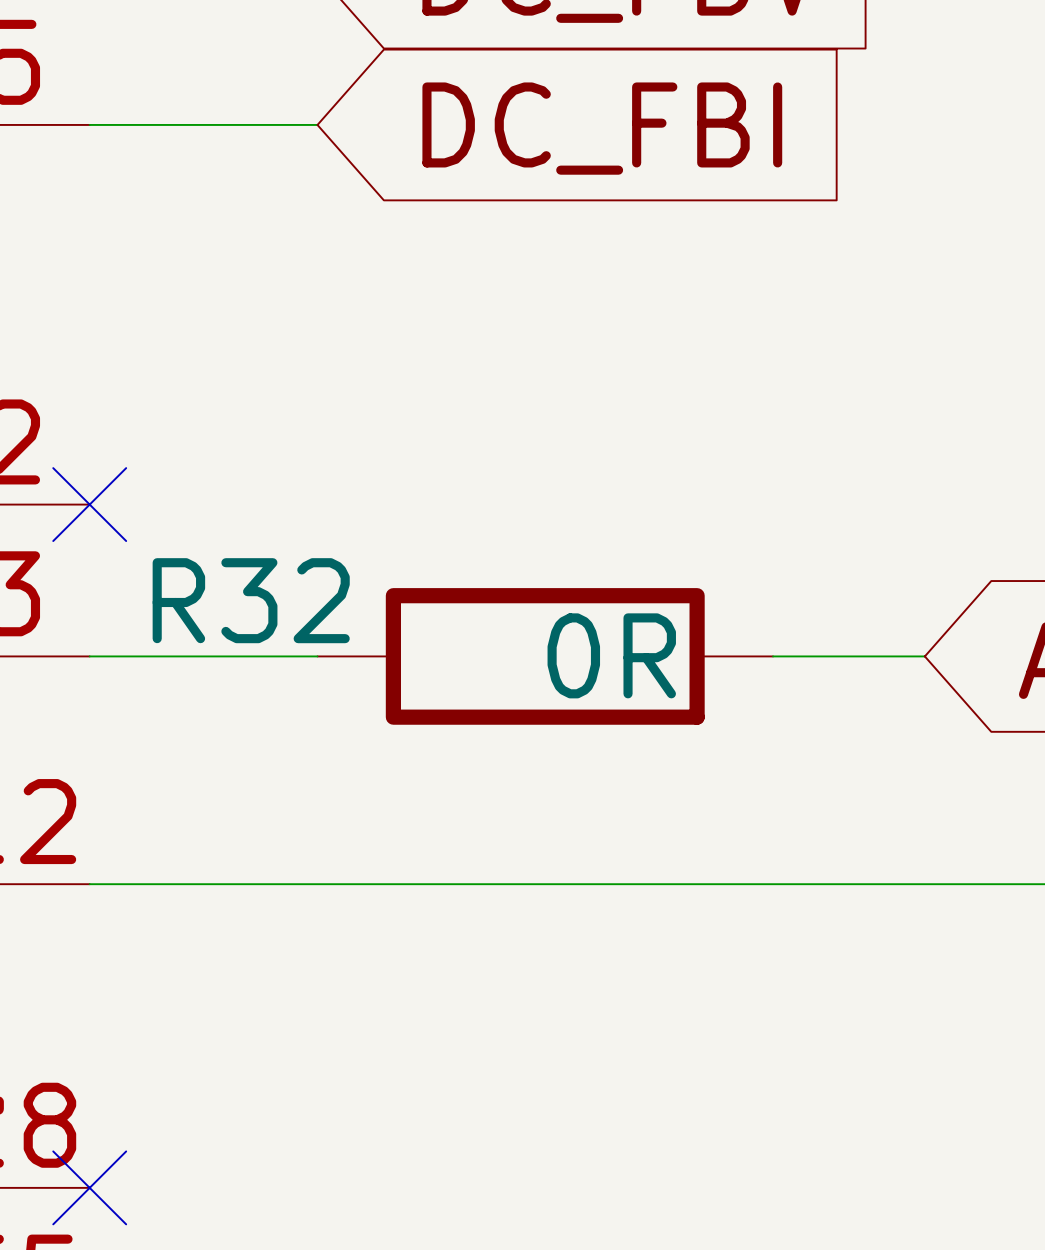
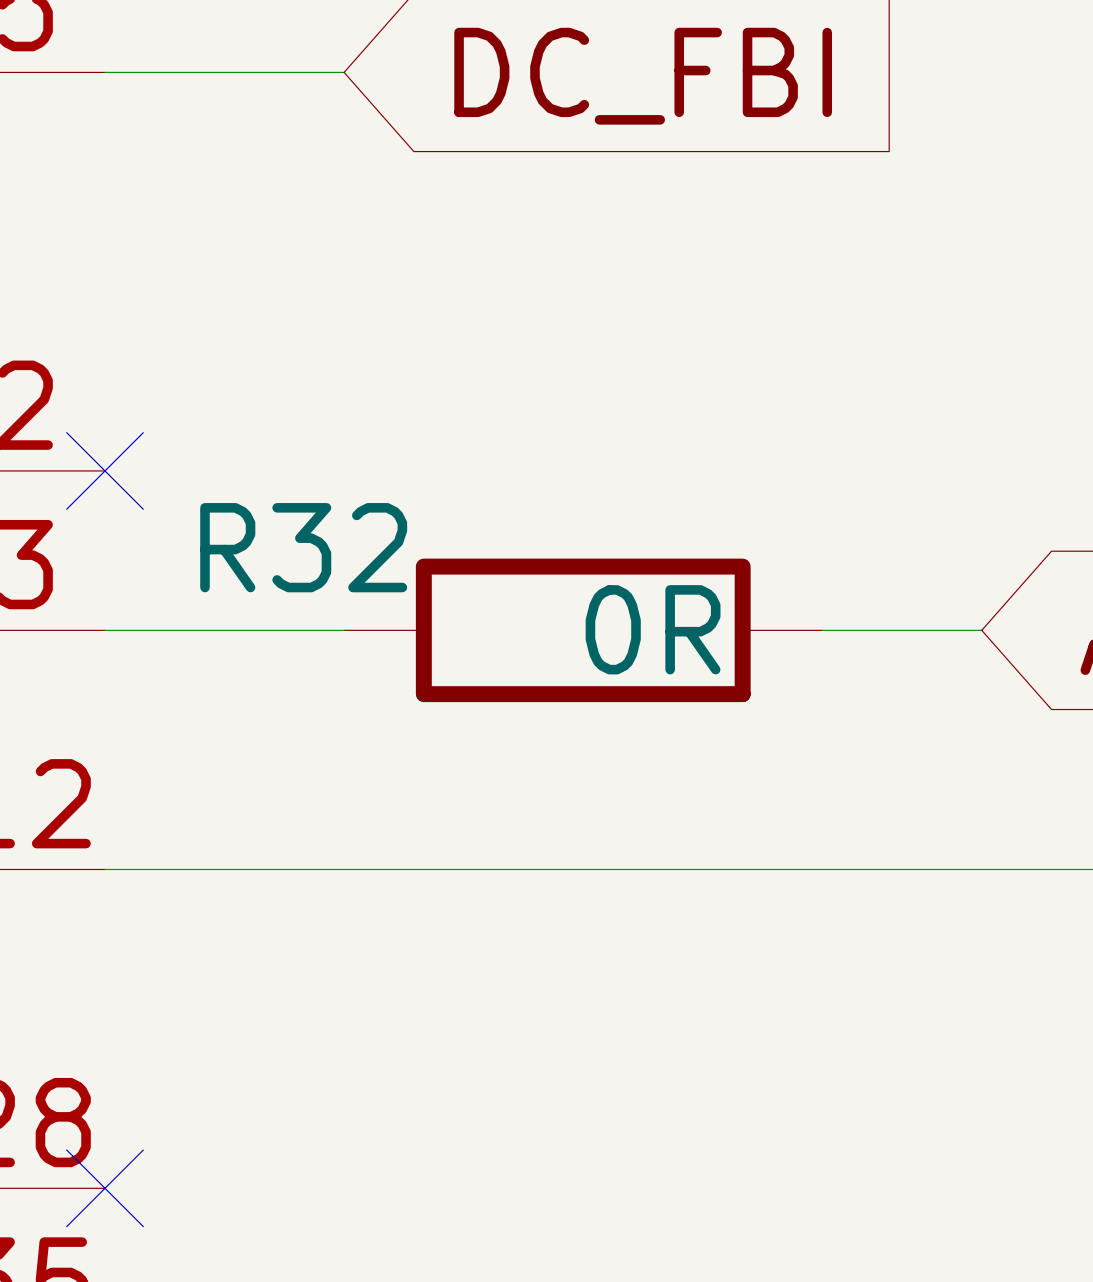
R32 name position: R32 (251, 600) -> R32 (303, 547)

